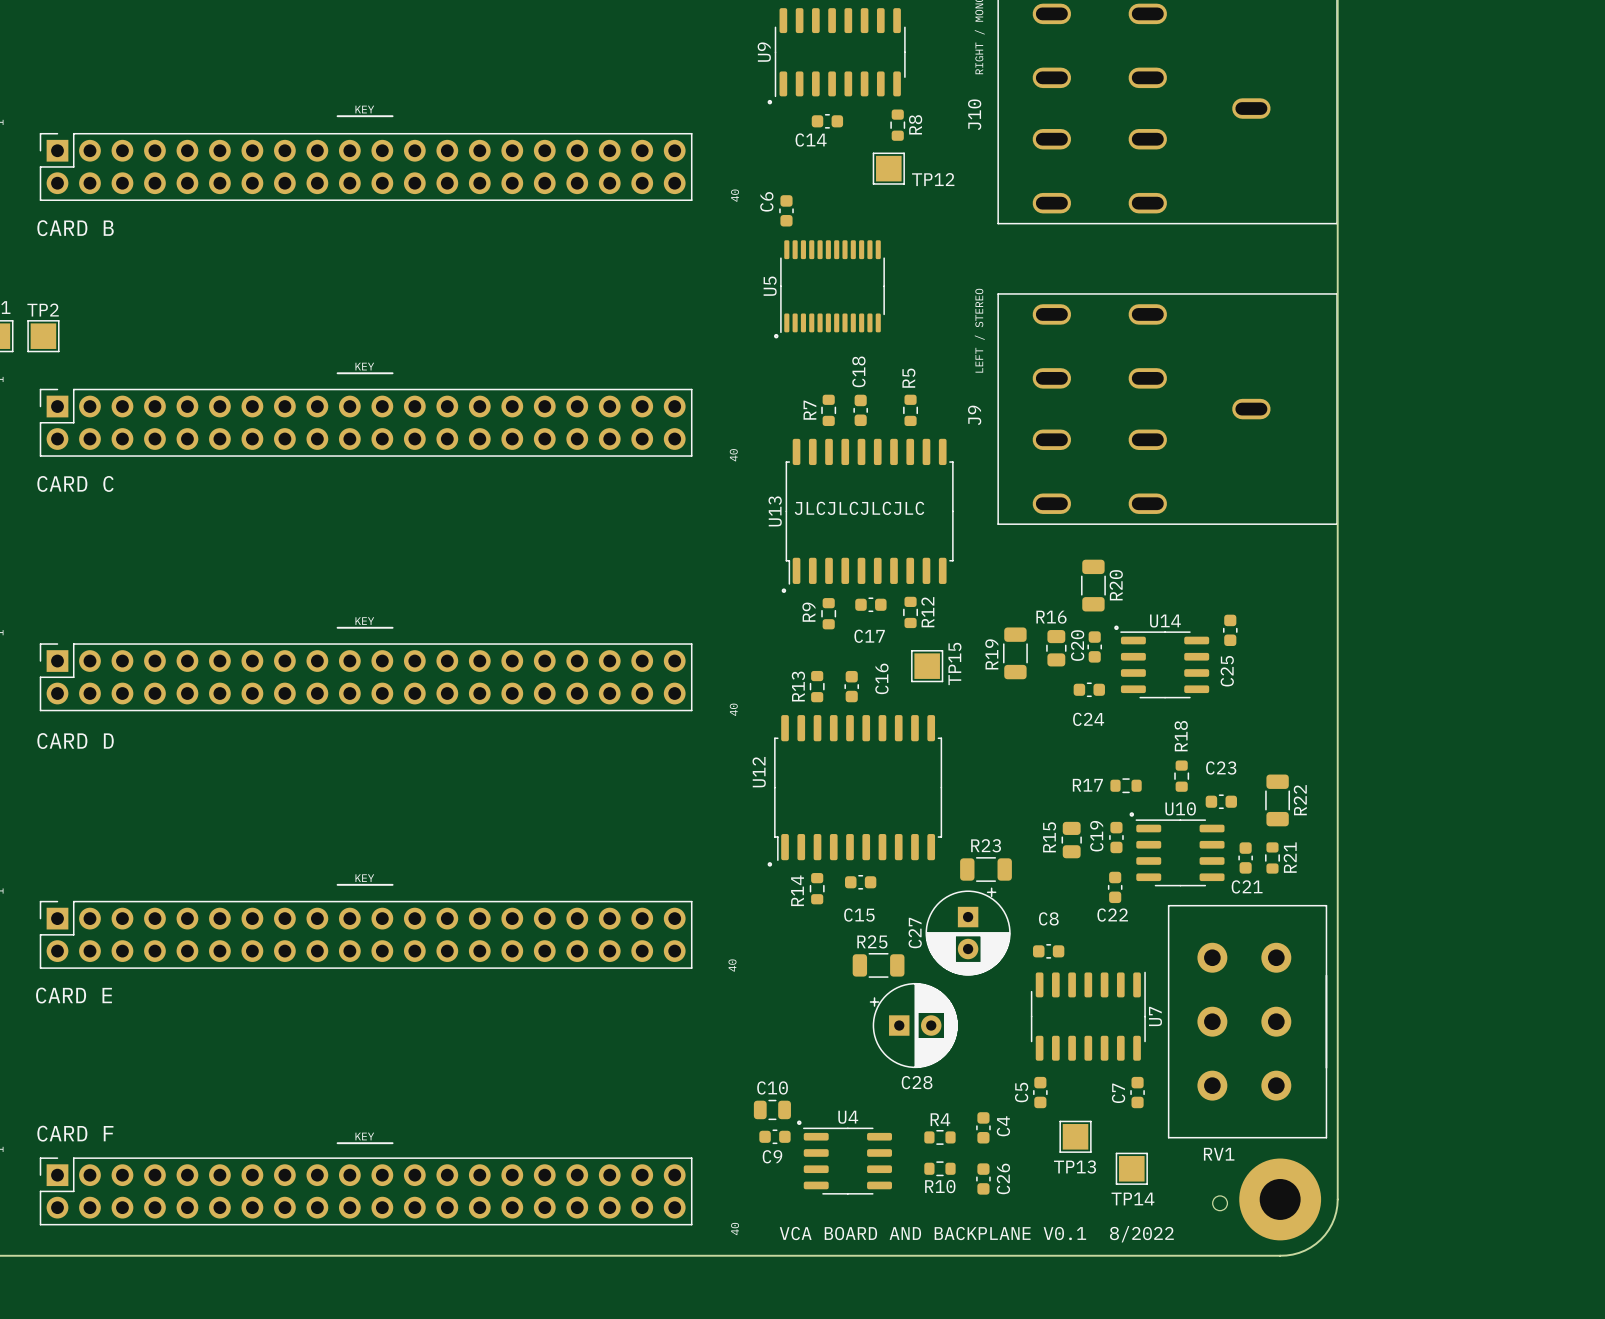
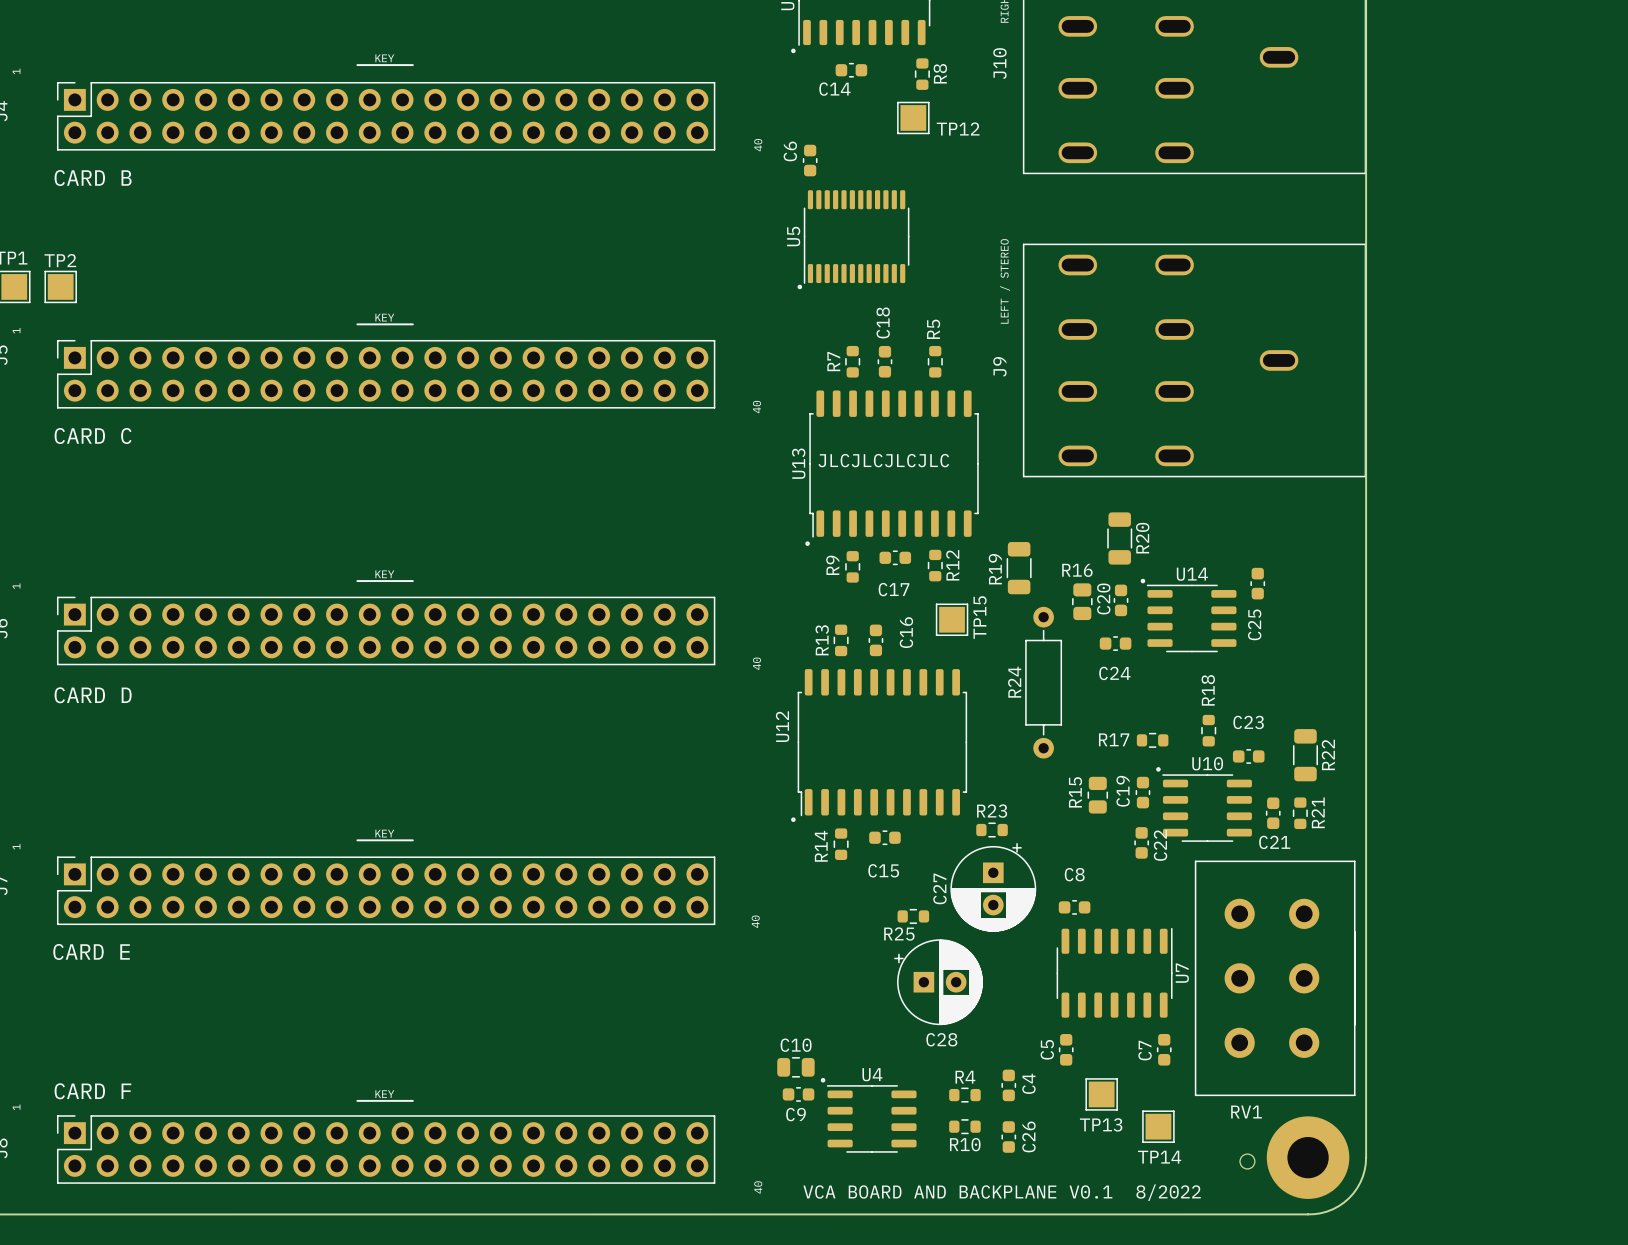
R19 position: (1015, 653) -> (1019, 568)
R24: none -> (1043, 682)
R23 footprint: [960, 857, 1012, 882] -> [976, 822, 1008, 838]
C22 name rotation: 0° (1112, 915) -> 90° counterclockwise (1160, 845)
R25 name position: R25 (872, 941) -> R25 (899, 934)
R25 footprint: [852, 953, 905, 978] -> [897, 908, 930, 924]

